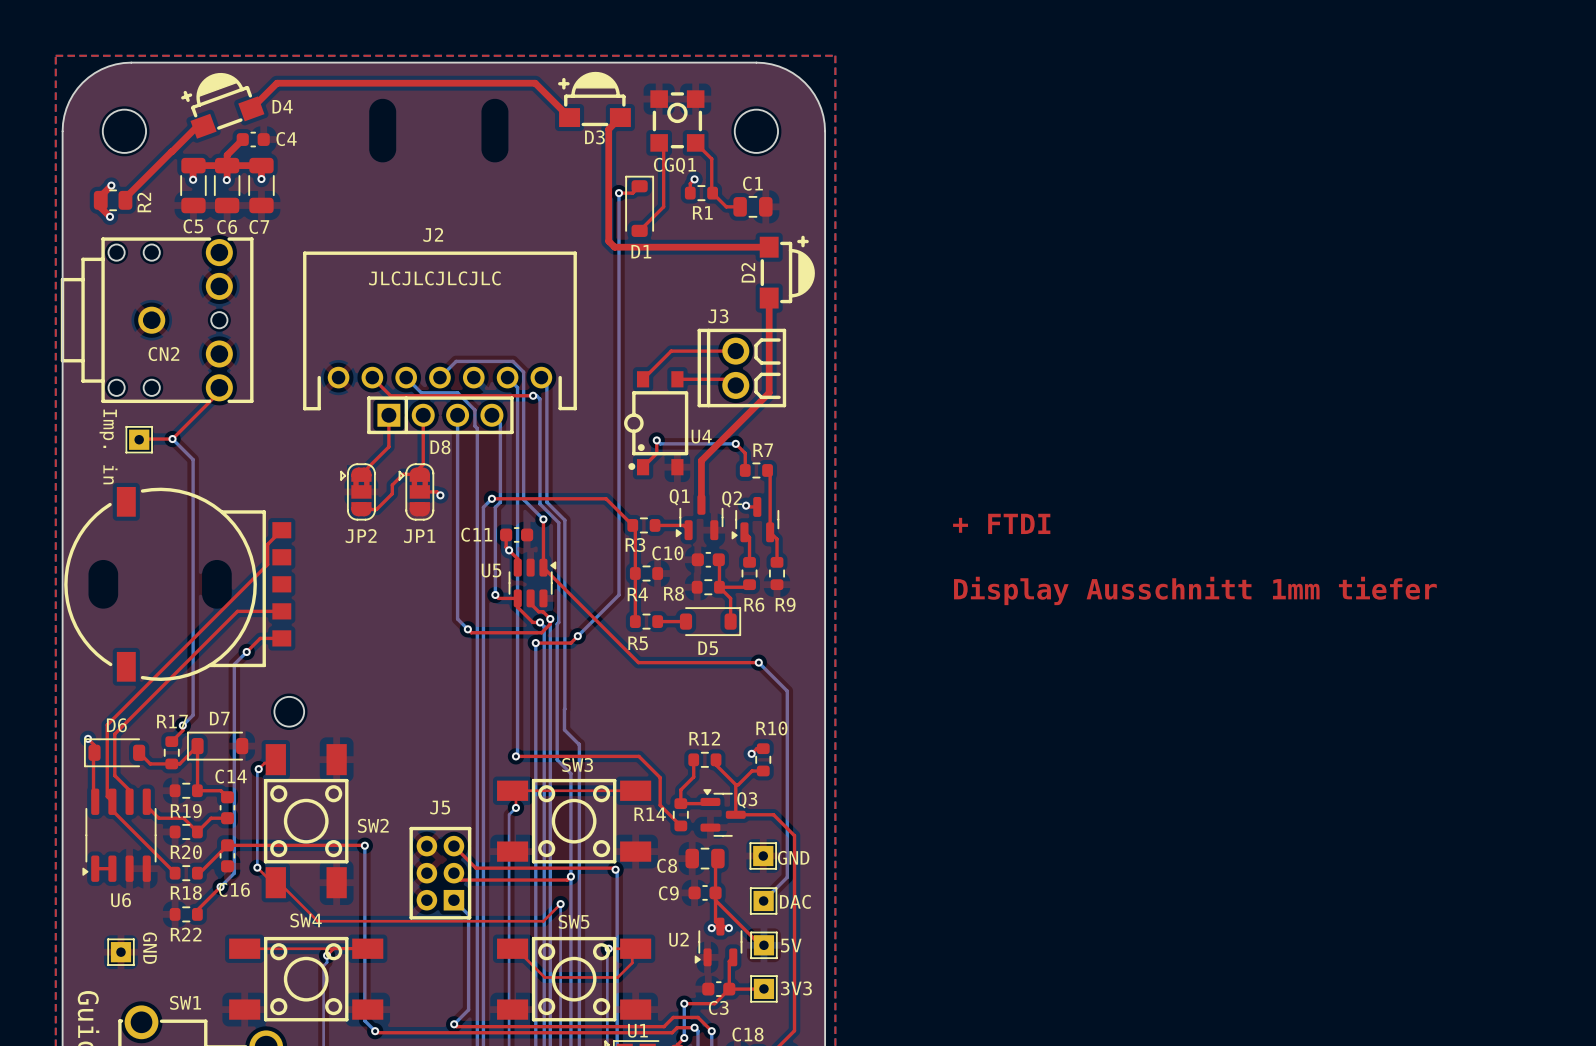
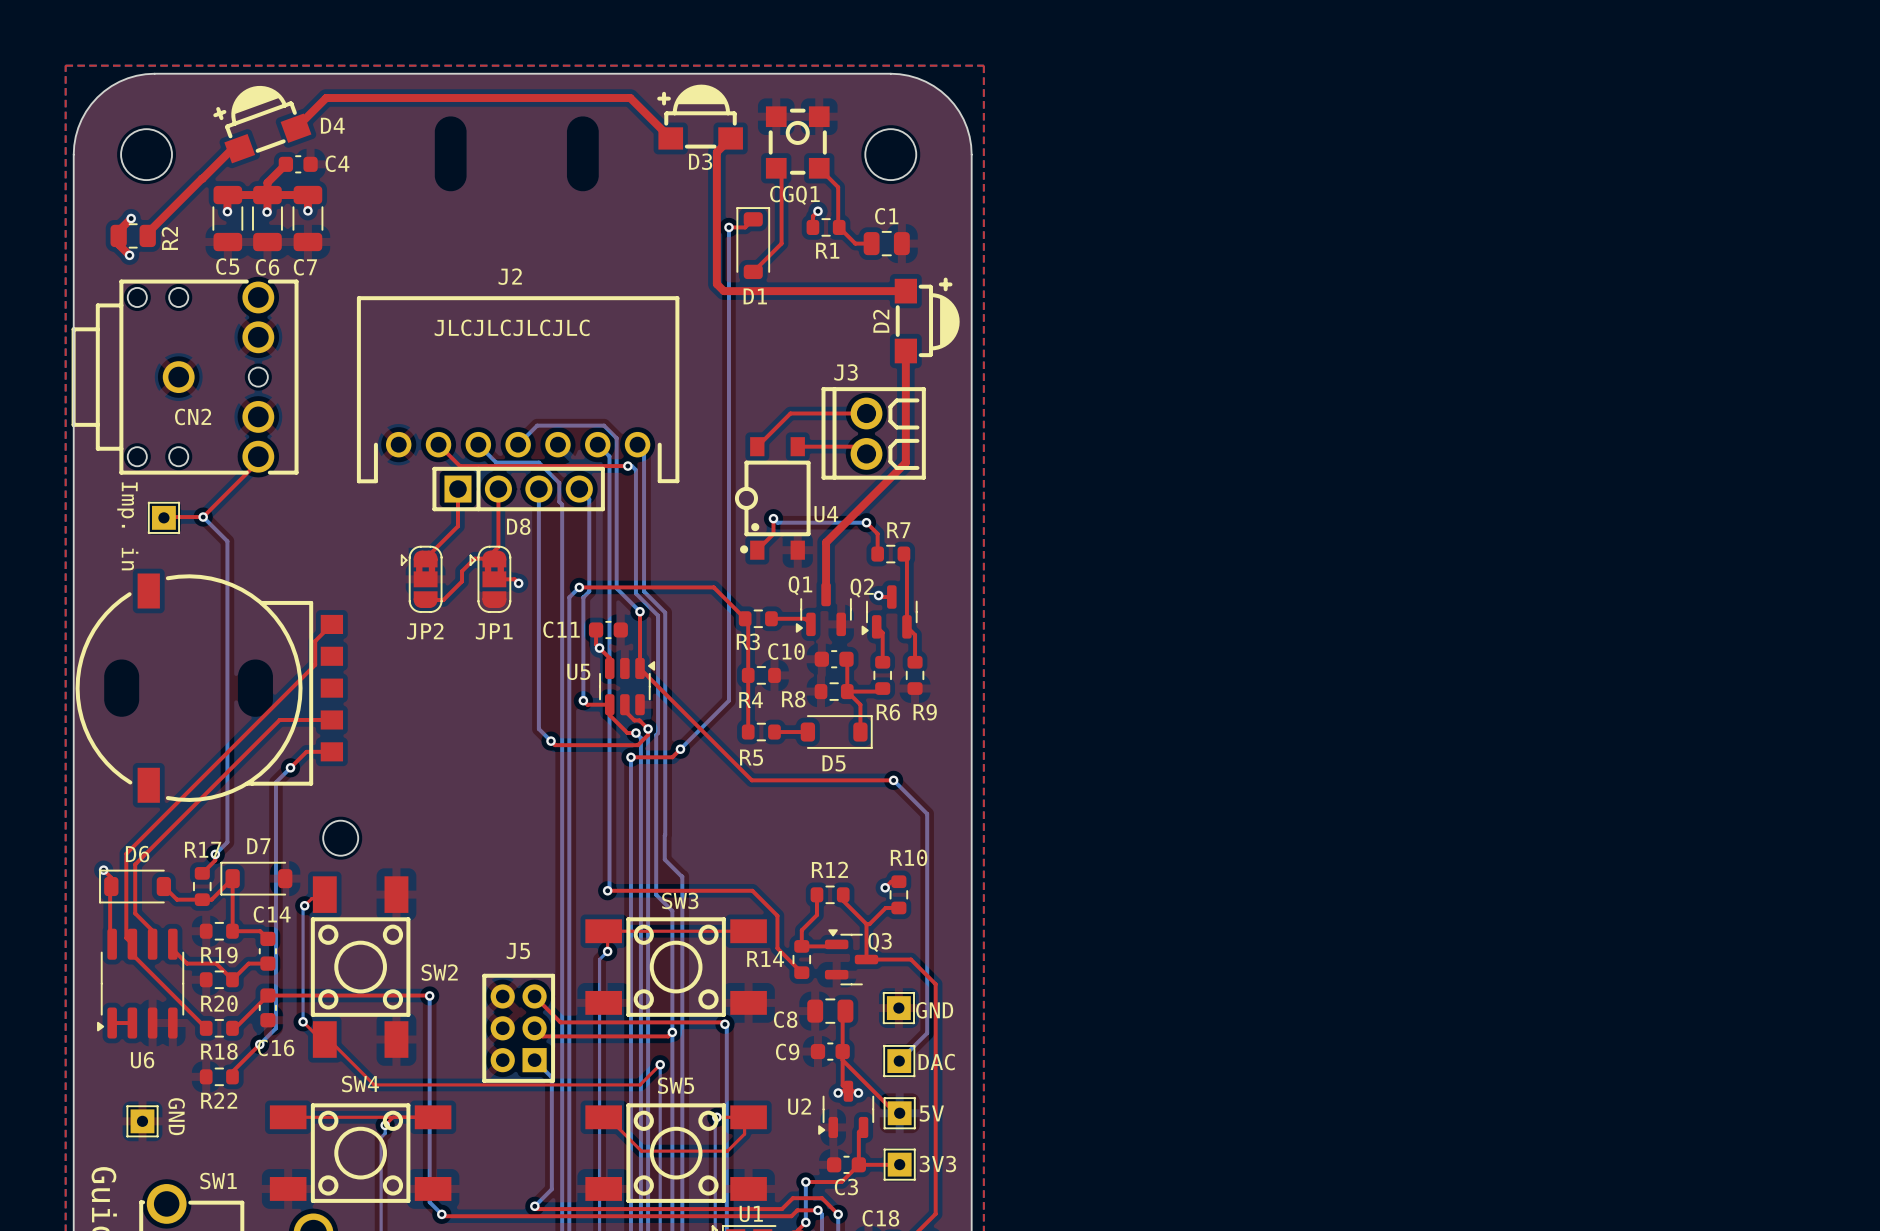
text: + FTDI (1001, 523) -> none
text: Display Ausschnitt 1mm tiefer (1195, 590) -> none

